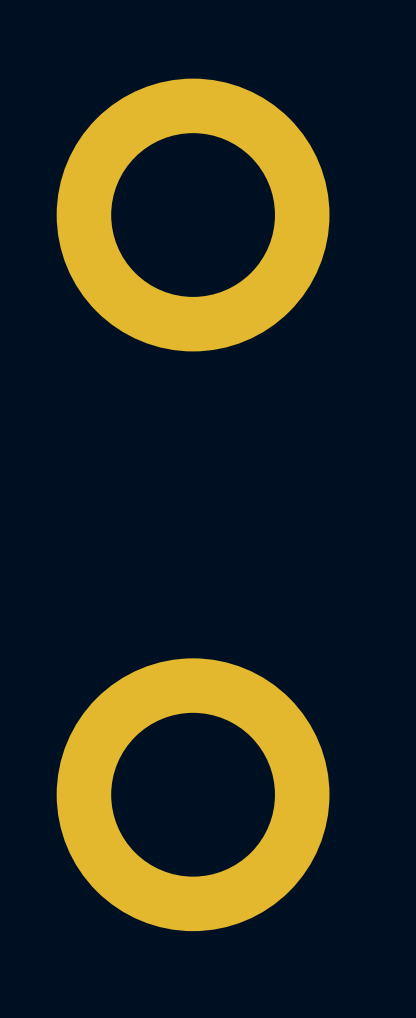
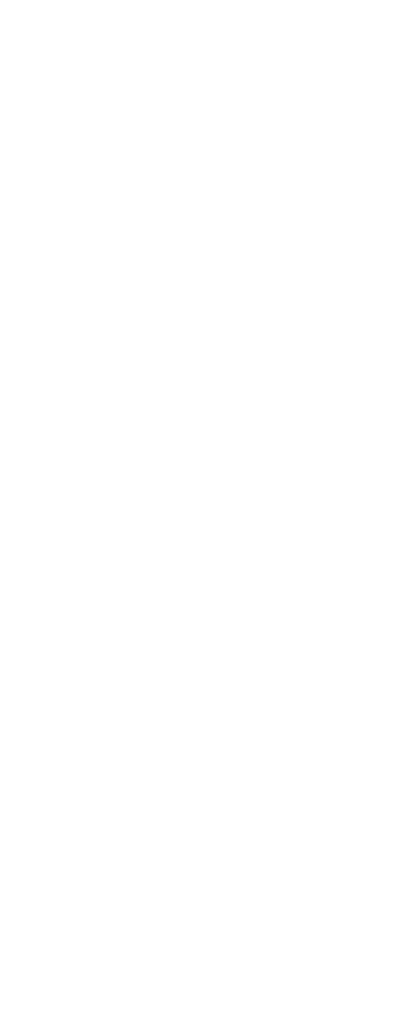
part: (193, 215) -> none
part: (193, 794) -> none

